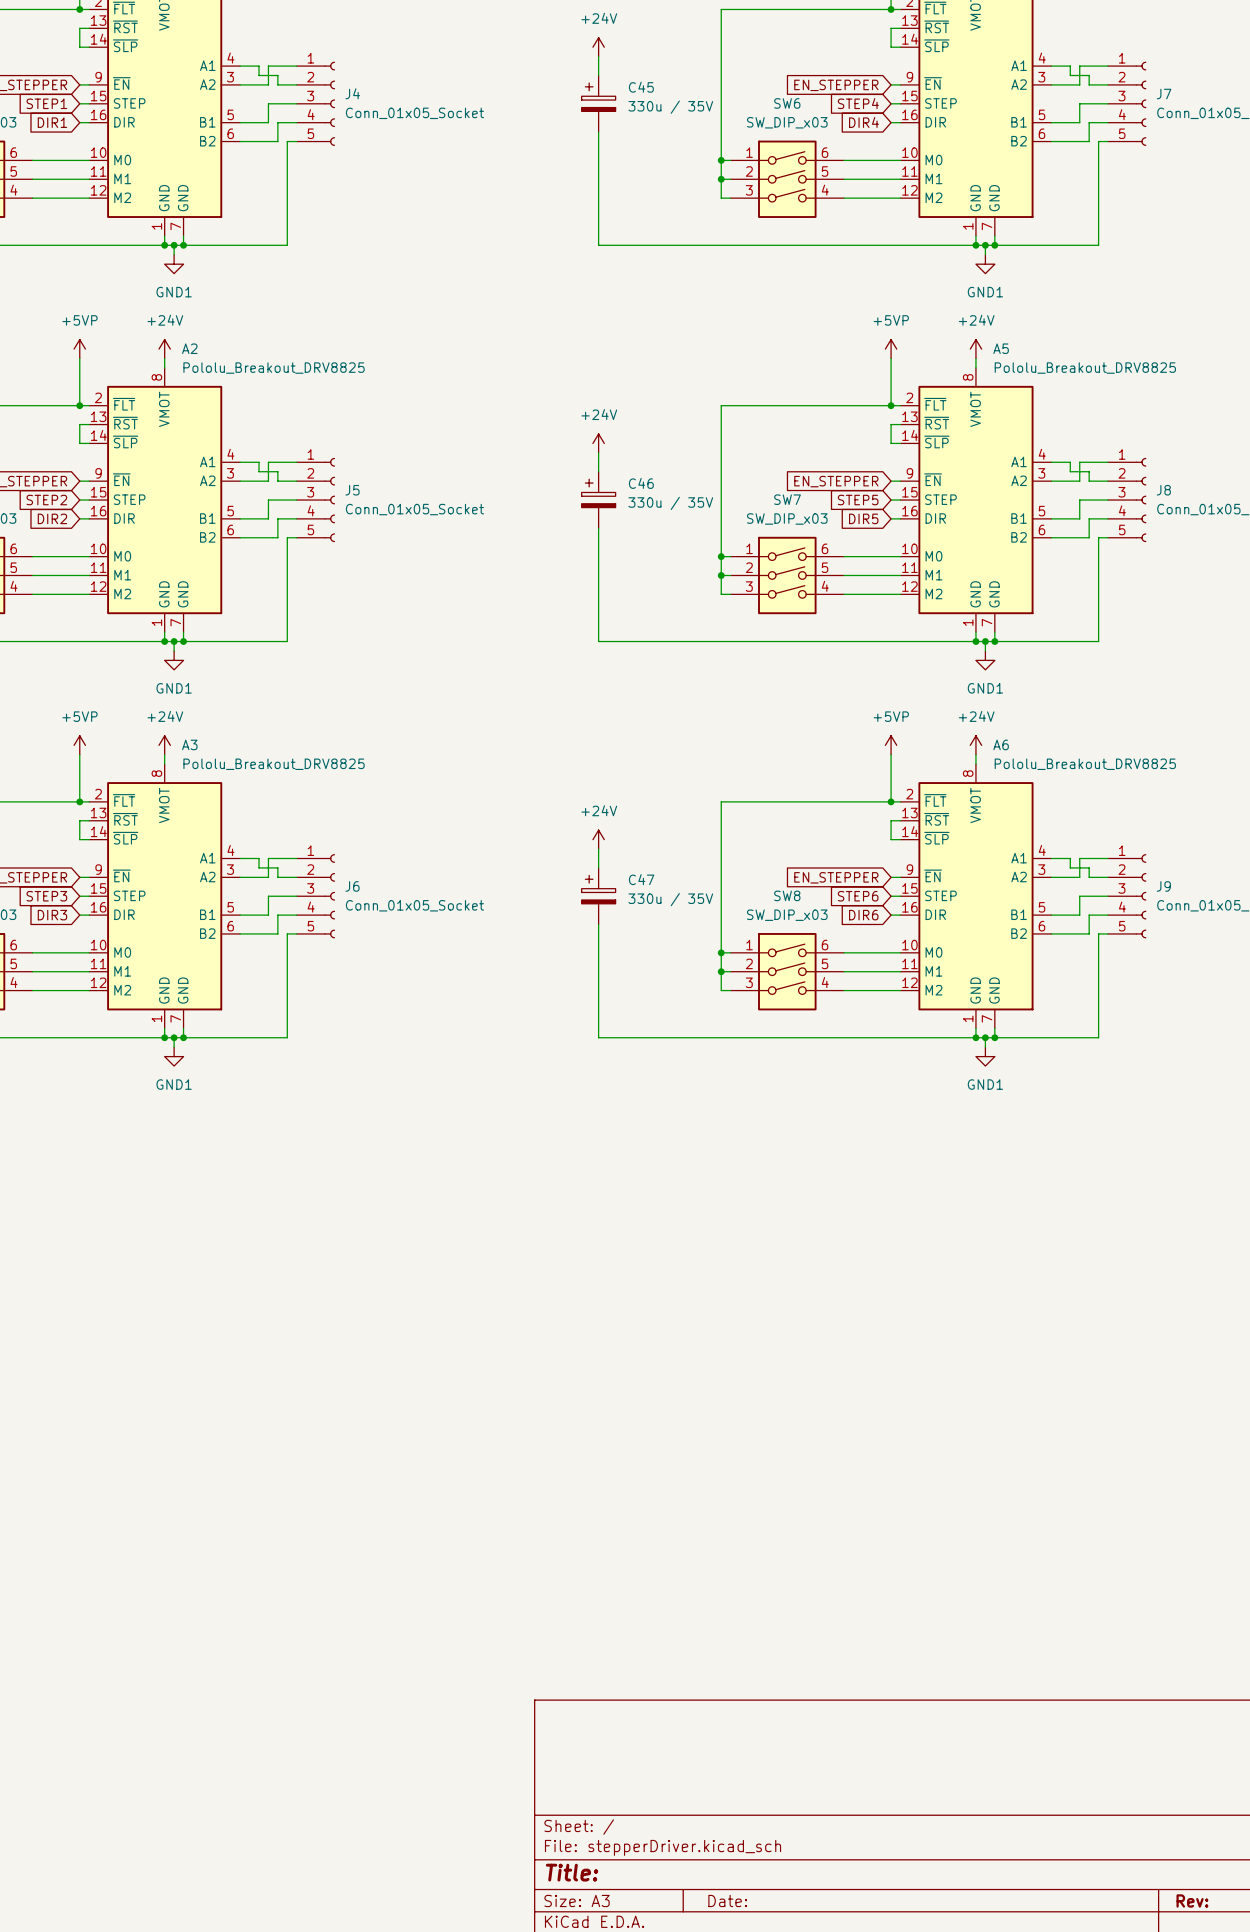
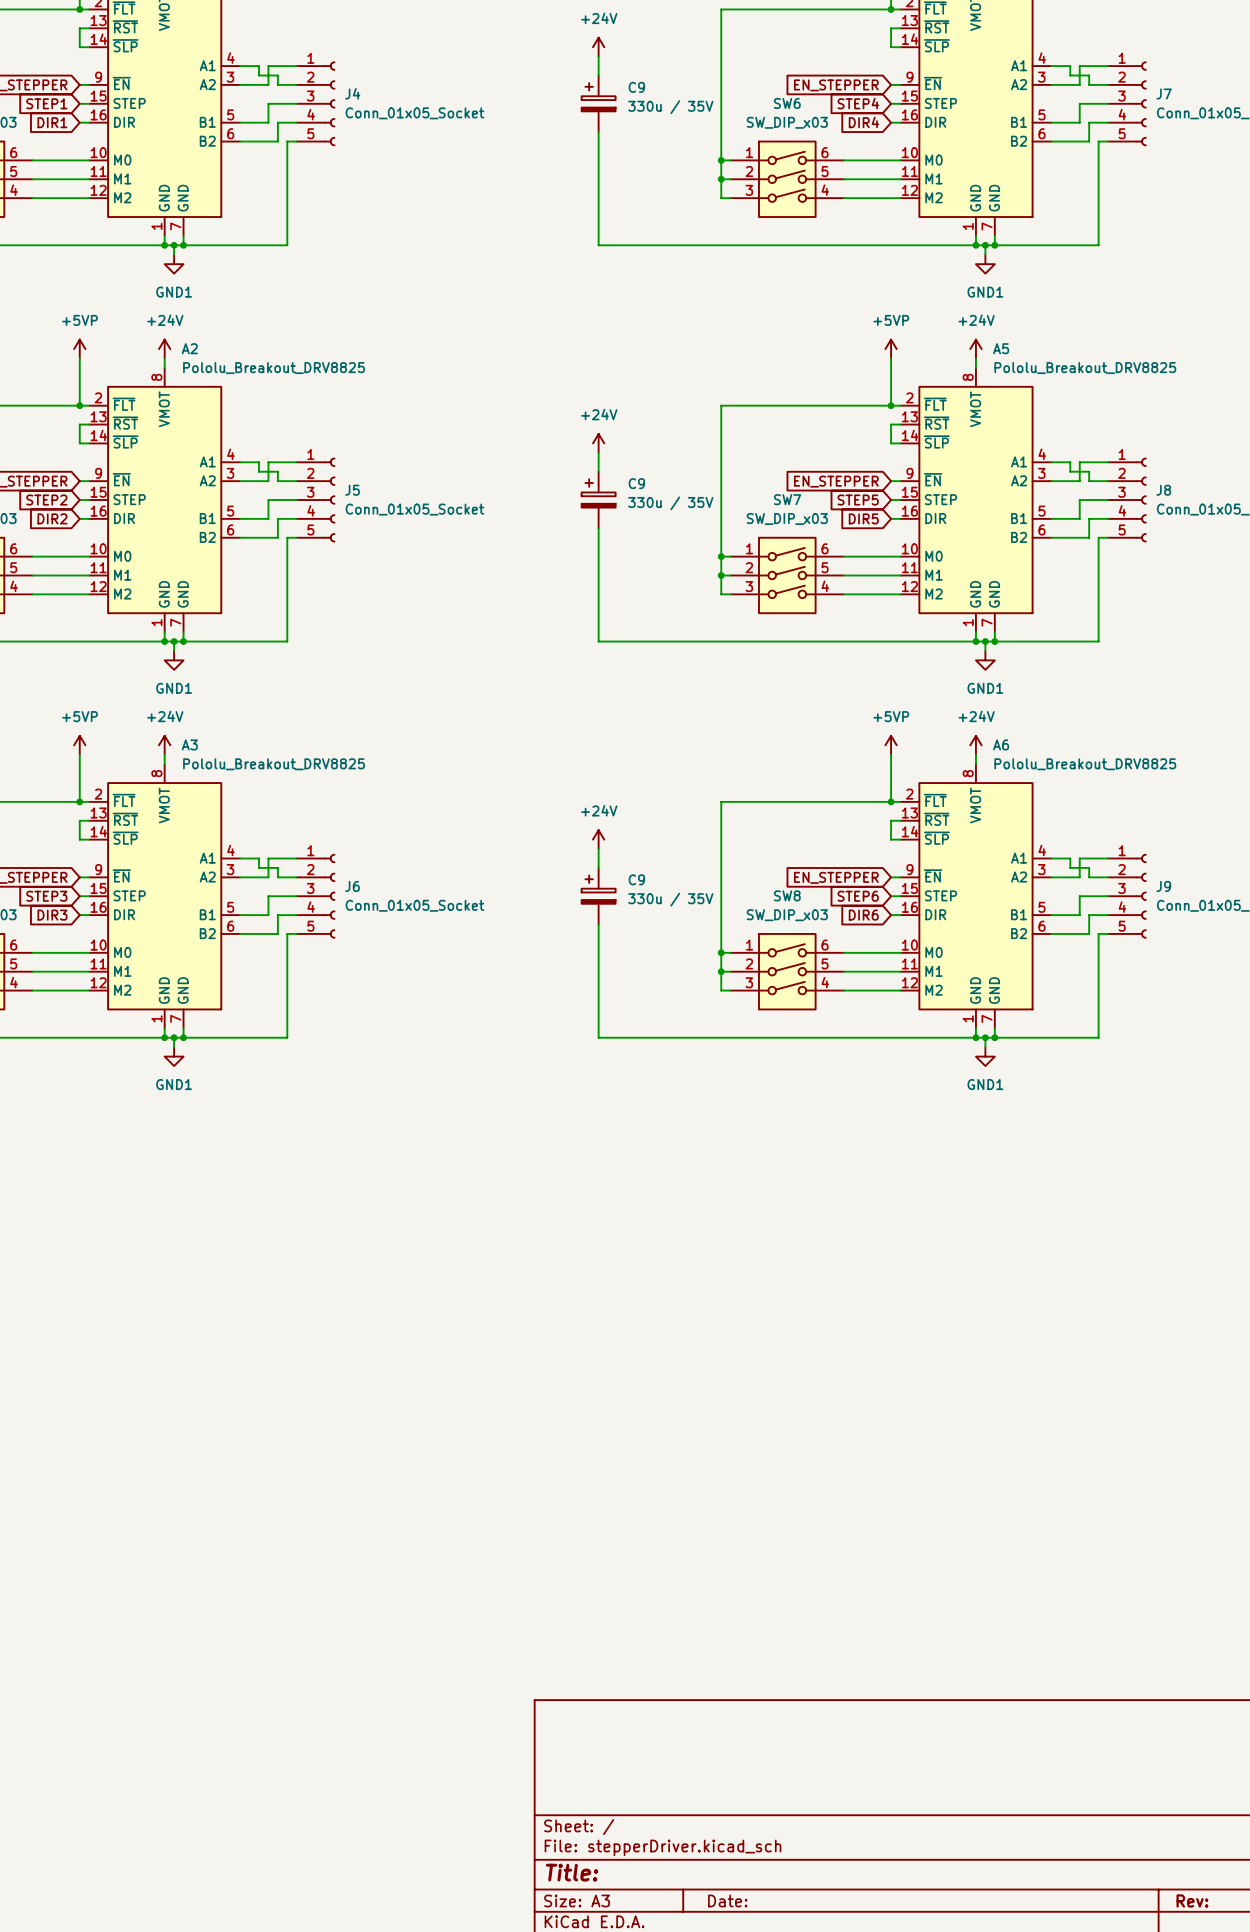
C45 name: C45 (641, 87) -> C9 (636, 87)
C46 name: C46 (641, 483) -> C9 (636, 483)
C47 name: C47 (641, 879) -> C9 (636, 879)

